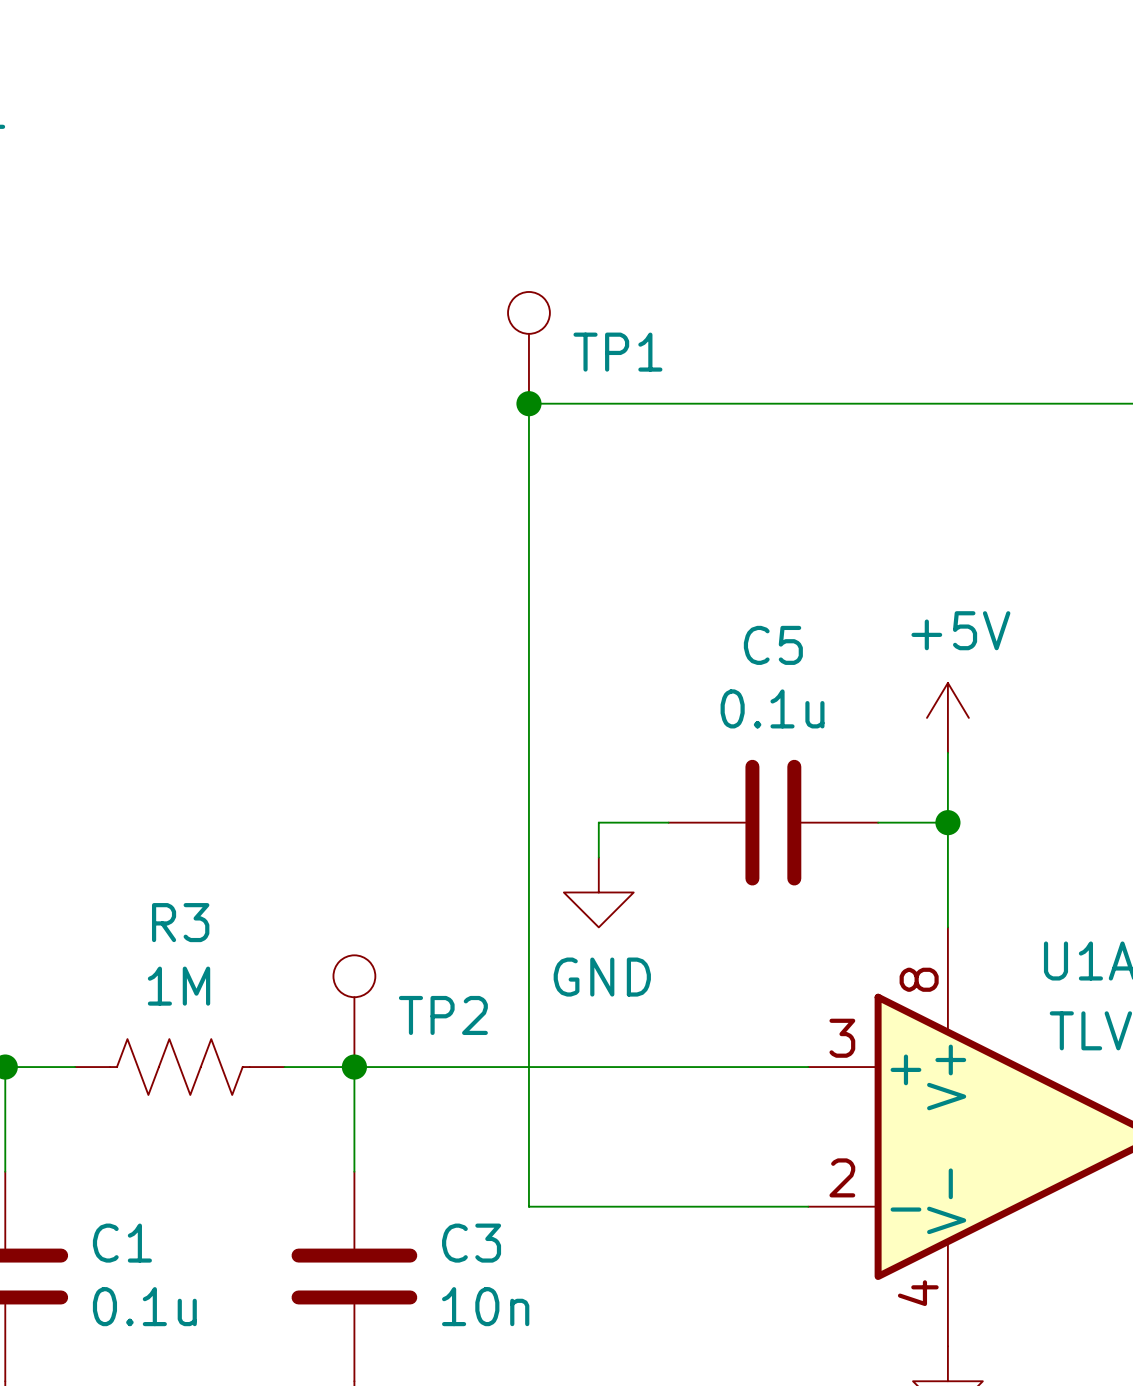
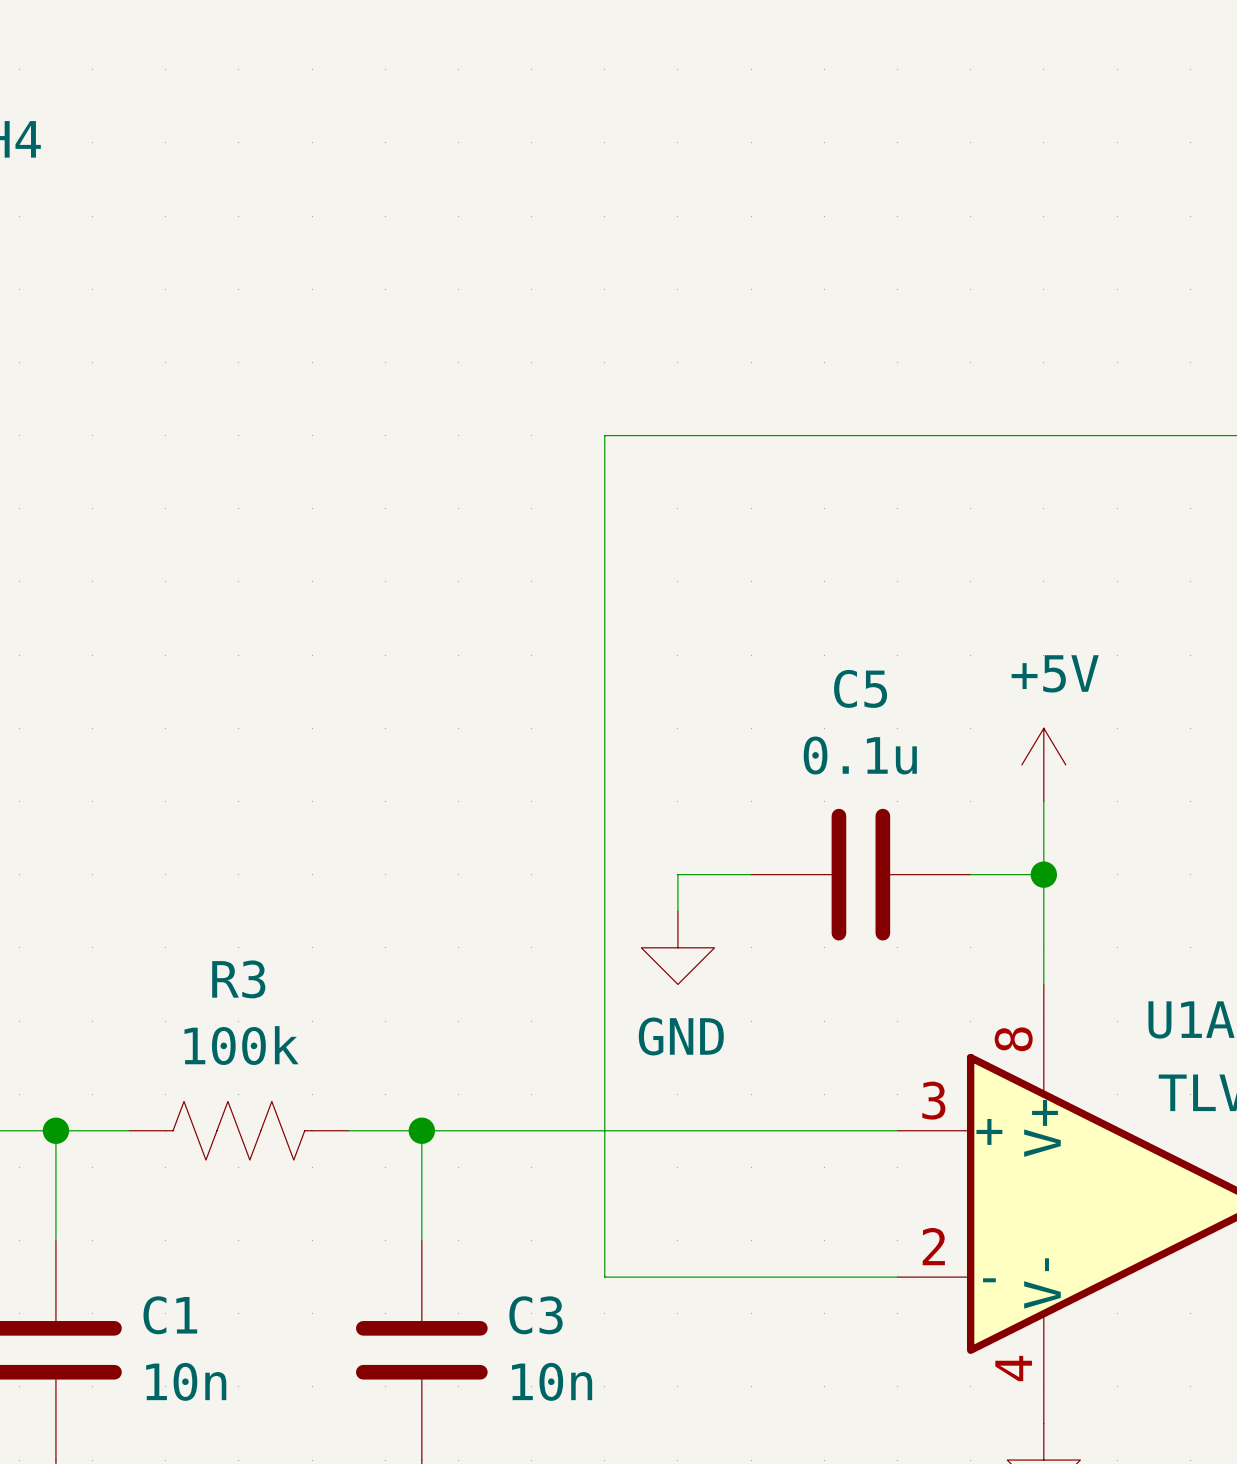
TP1: (528, 347) -> none
junction: (528, 403) -> none
R3 value: 1M (179, 986) -> 100k (241, 1045)
TP2: (354, 1011) -> none
C1 value: 0.1u (144, 1306) -> 10n (186, 1381)

